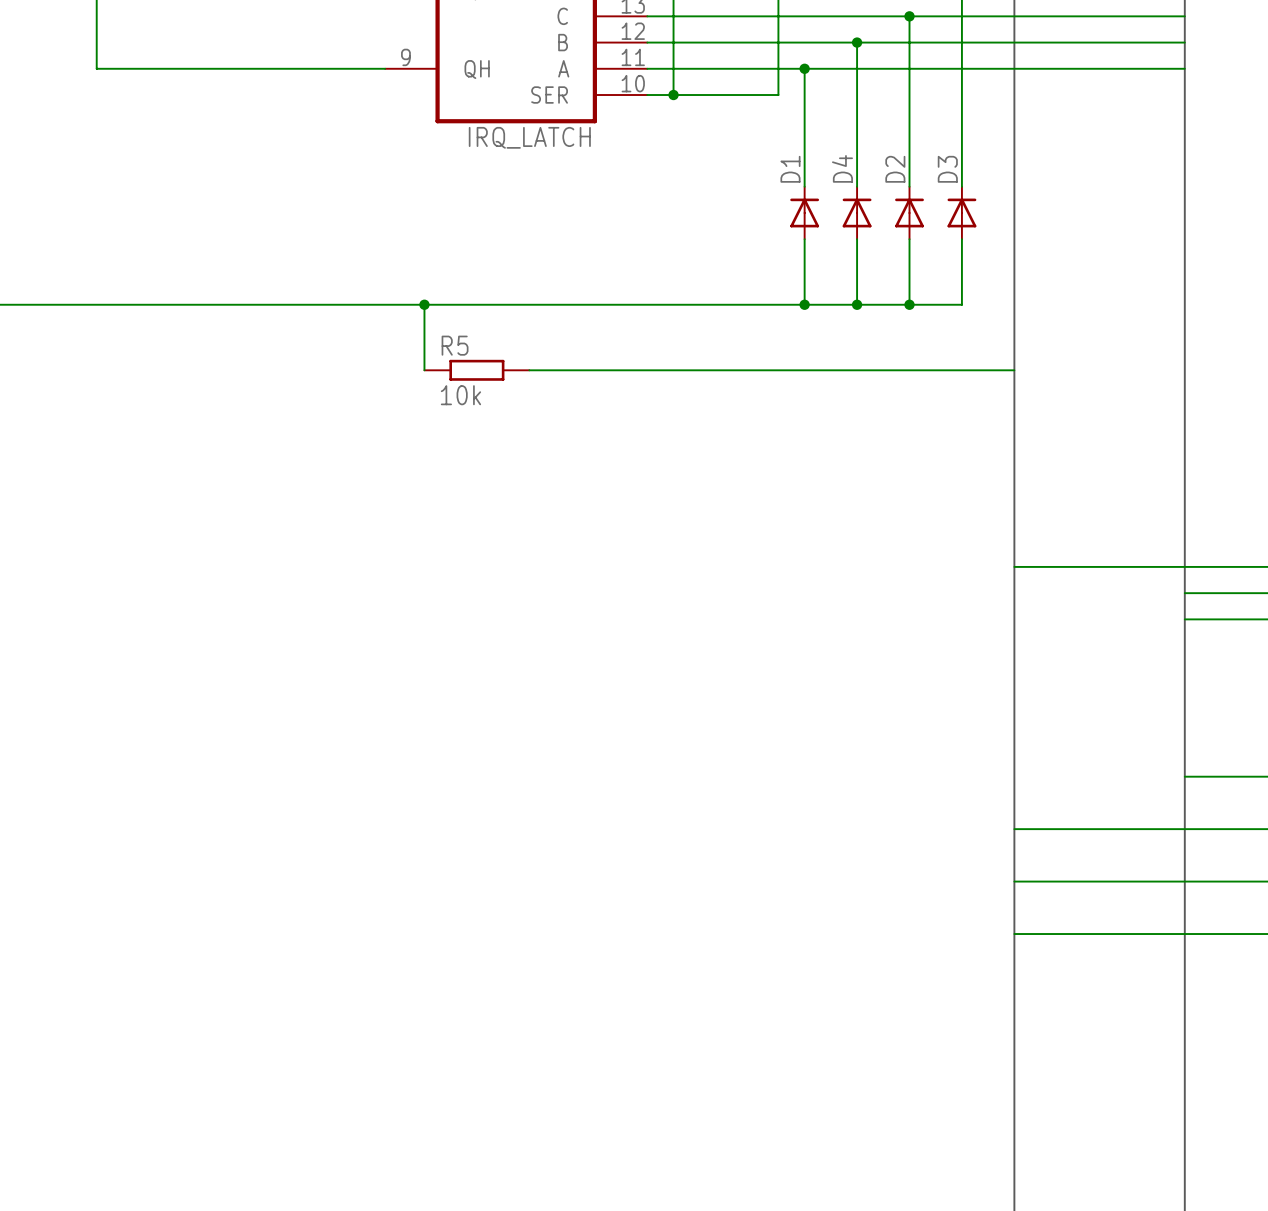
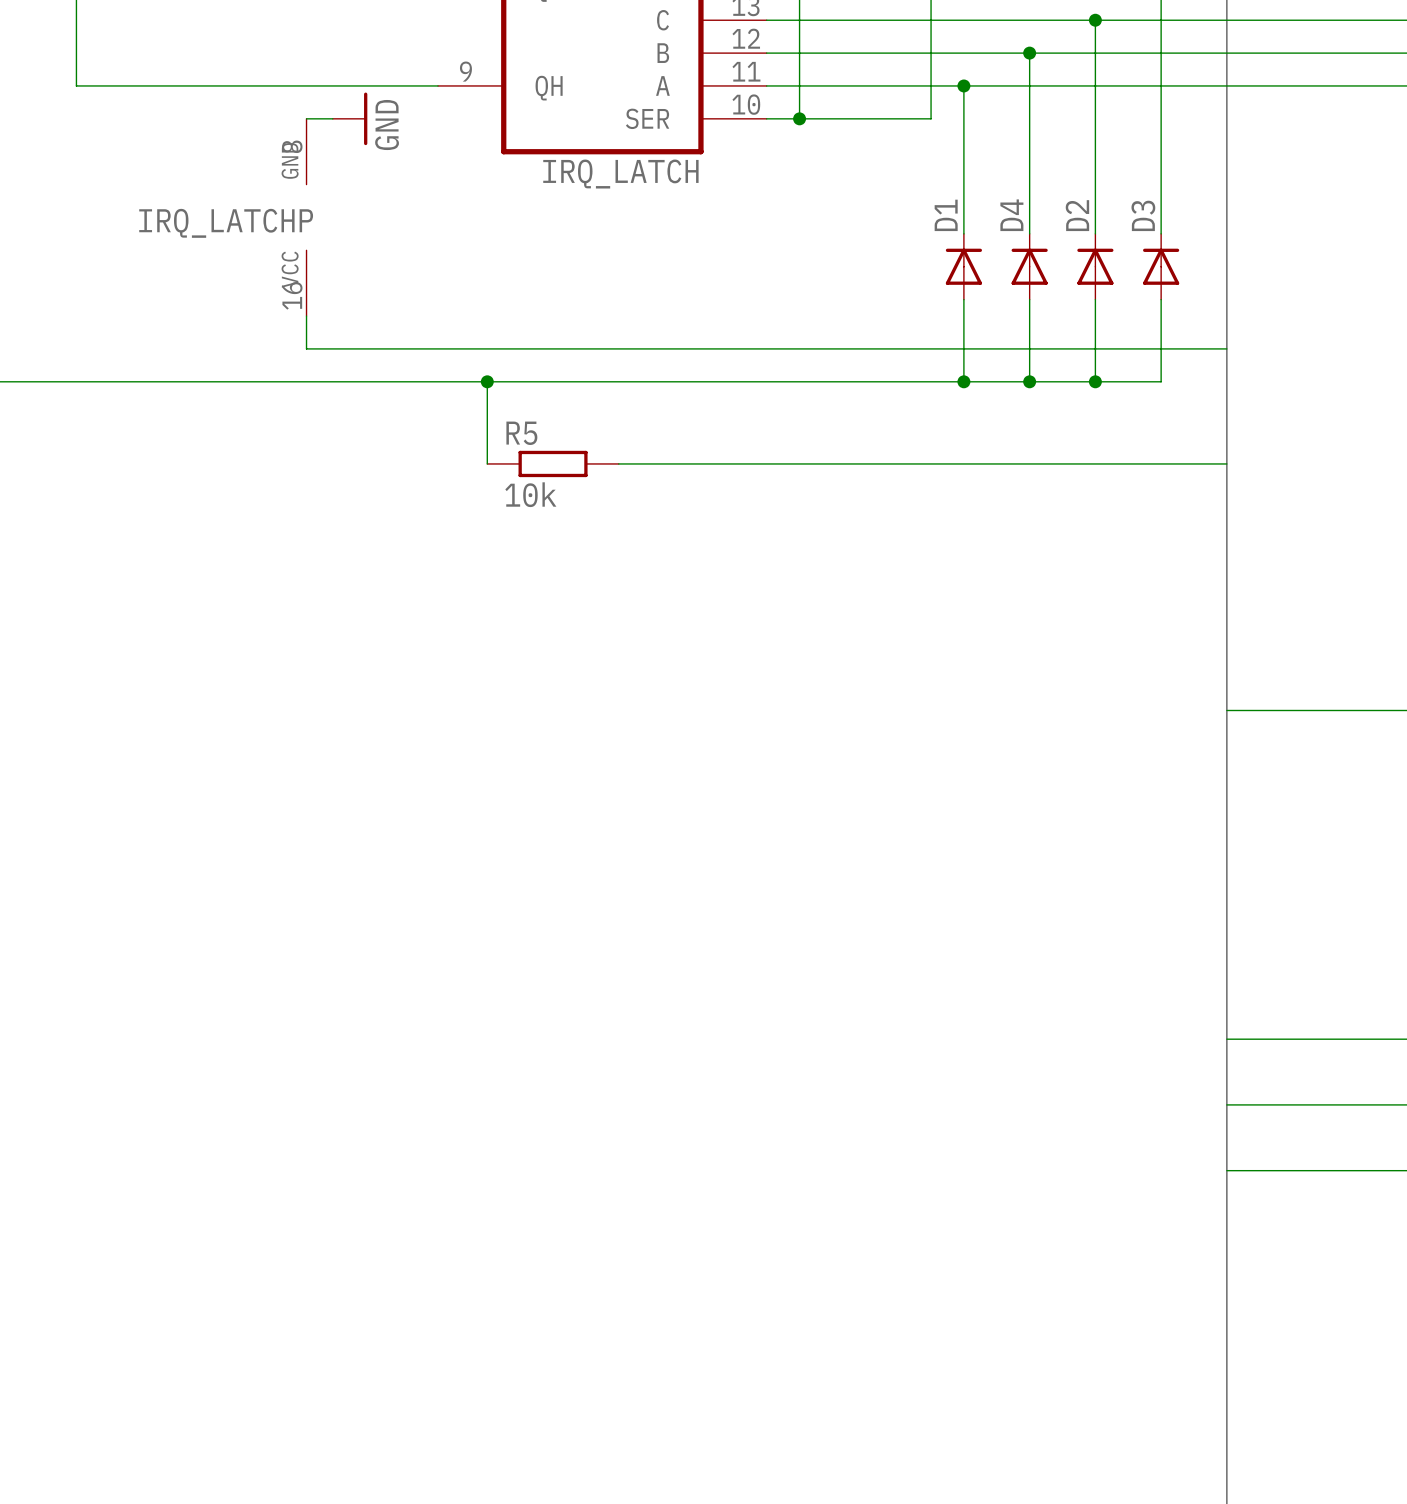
wire: none -> (306, 118) (332, 118)
power symbol: none -> GND (350, 118)
IRQ_LATCHP: none -> (306, 217)
wire: none -> (306, 316) (306, 348) (1226, 348)

